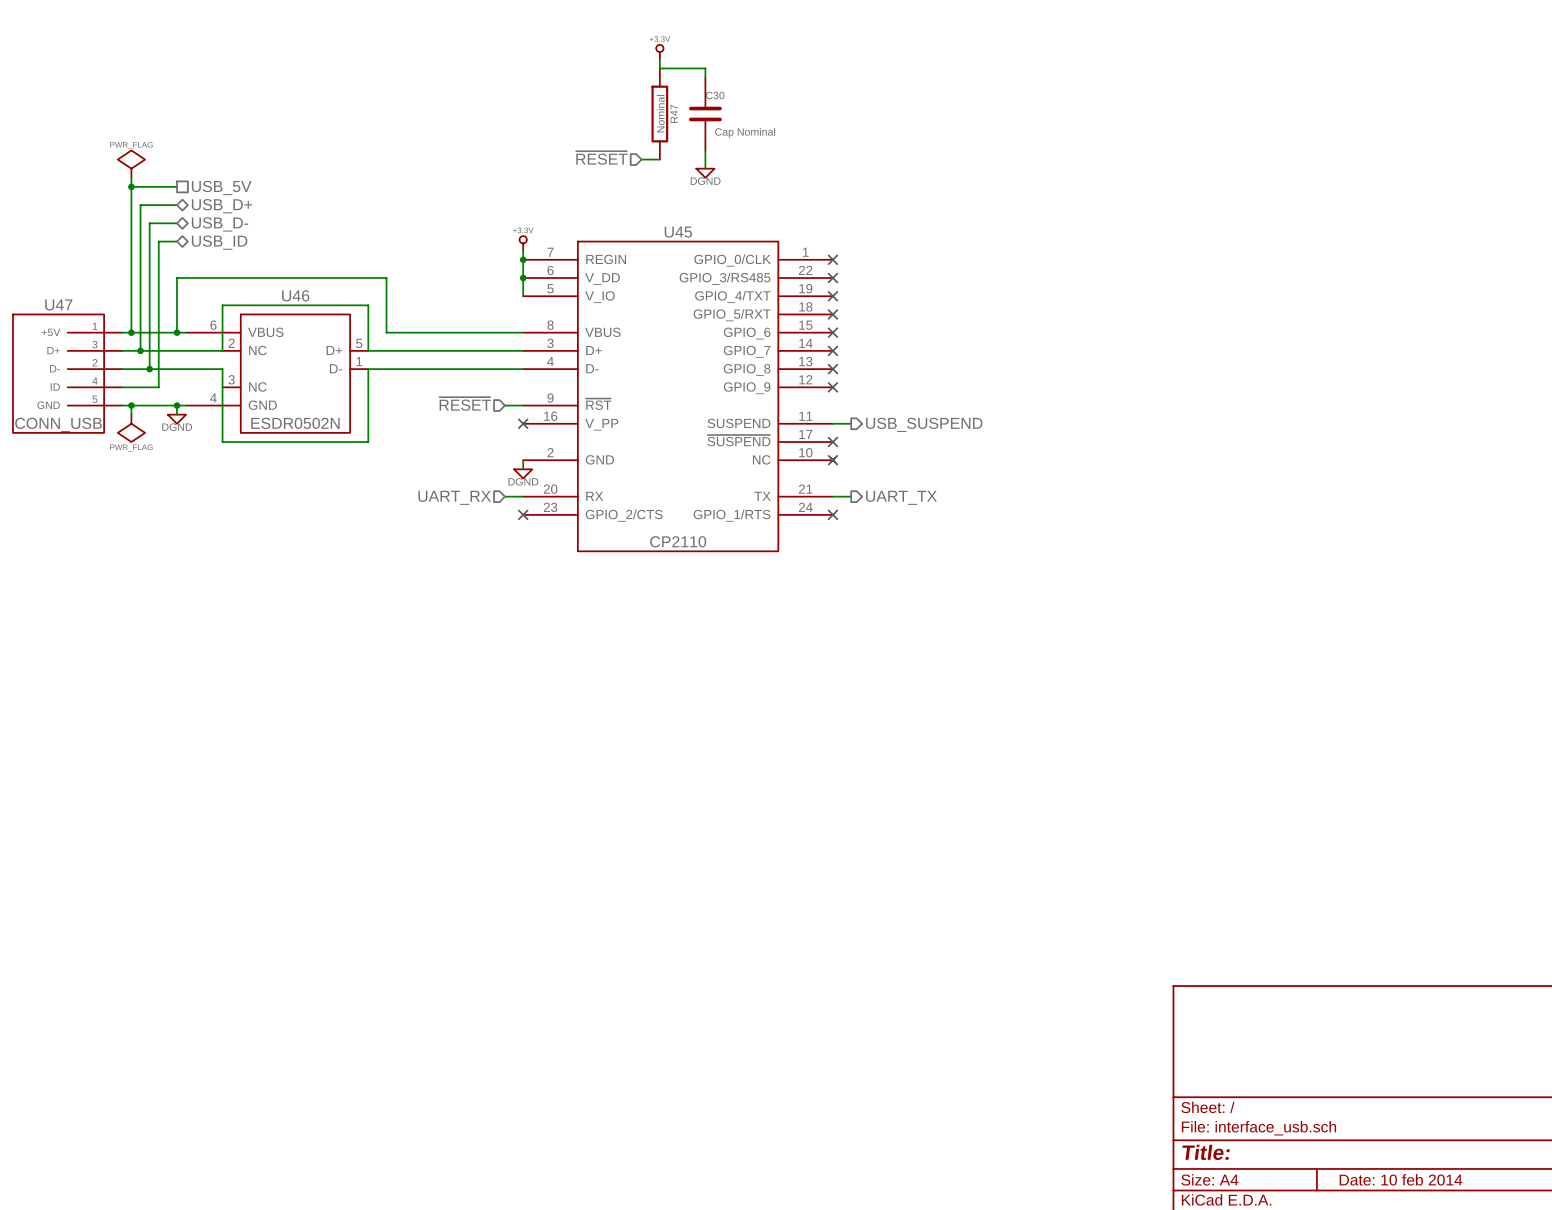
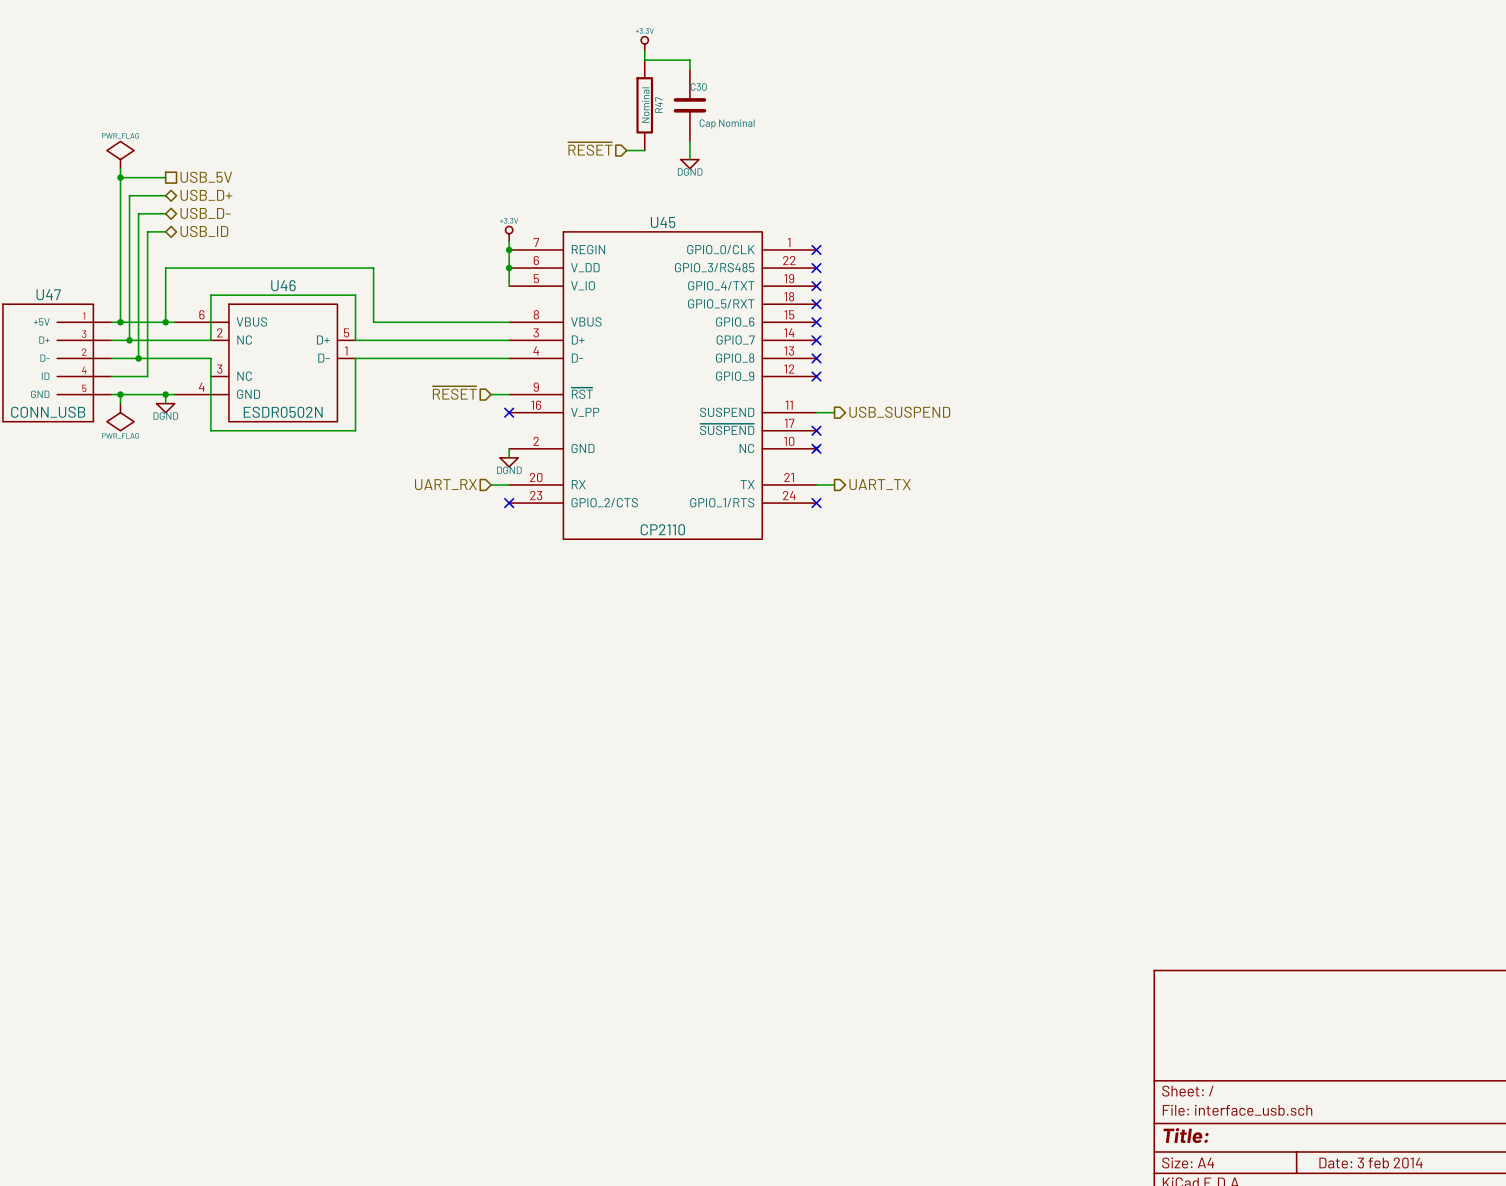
title block: Date: 10 feb 2014 (1401, 1179) -> Date: 3 feb 2014 (1370, 1162)

